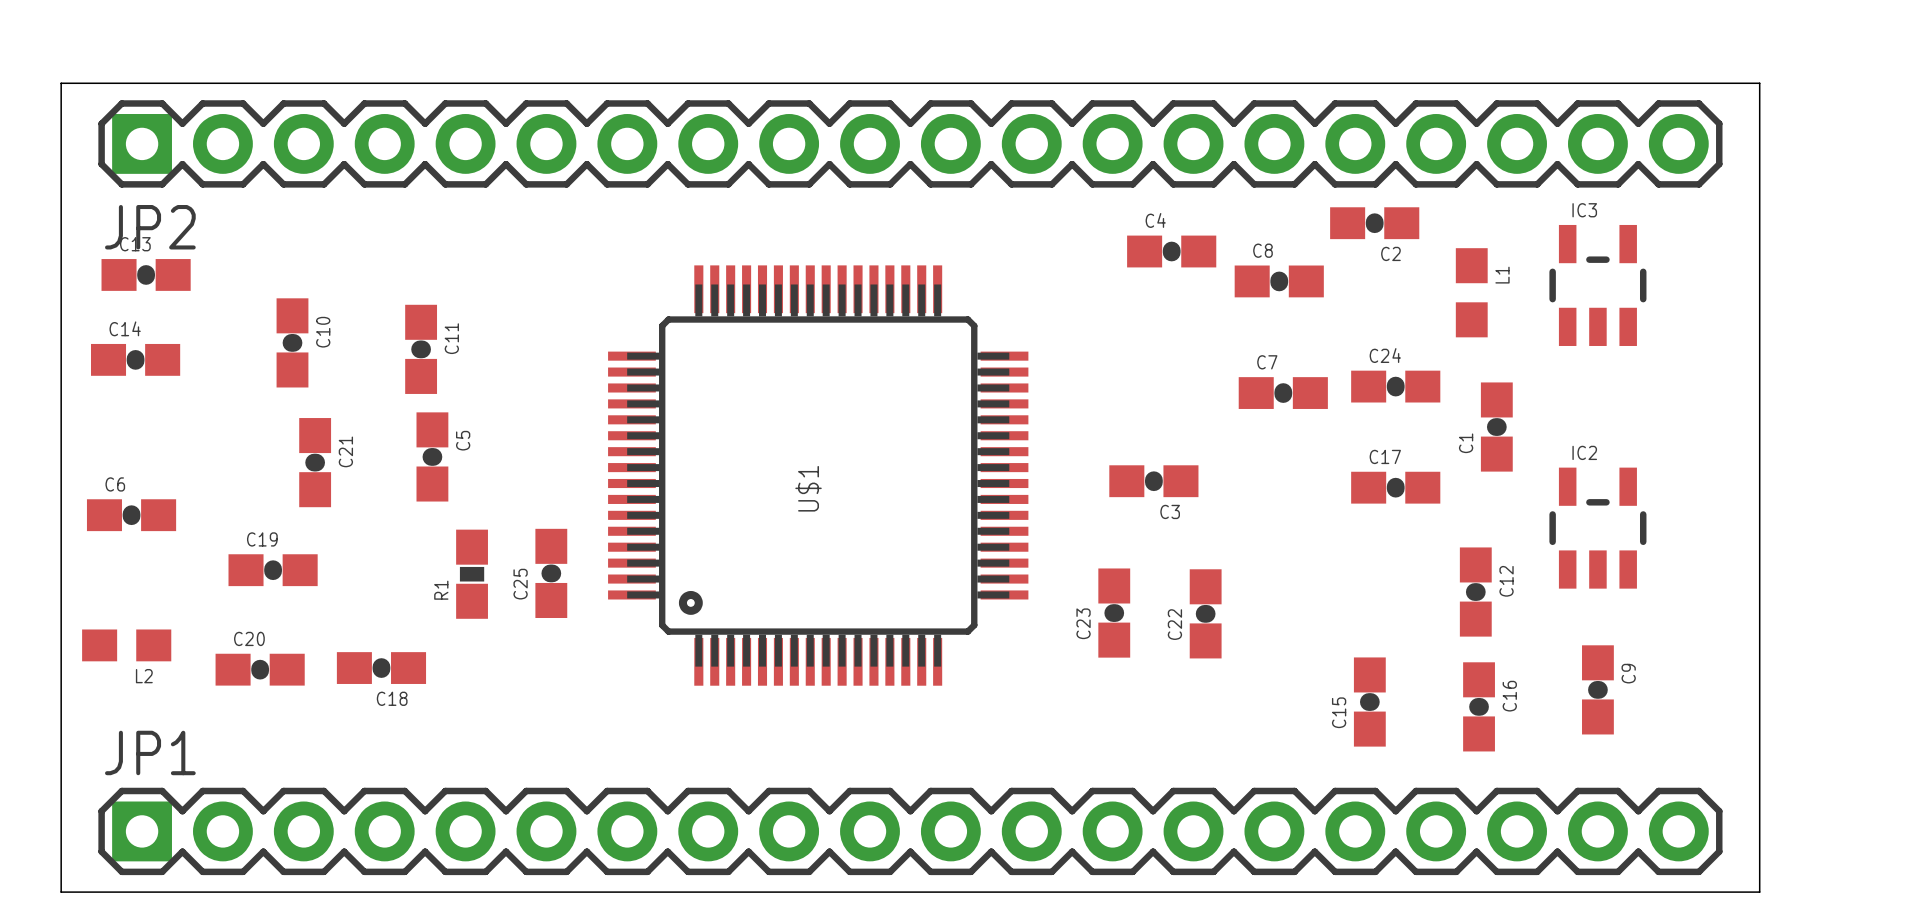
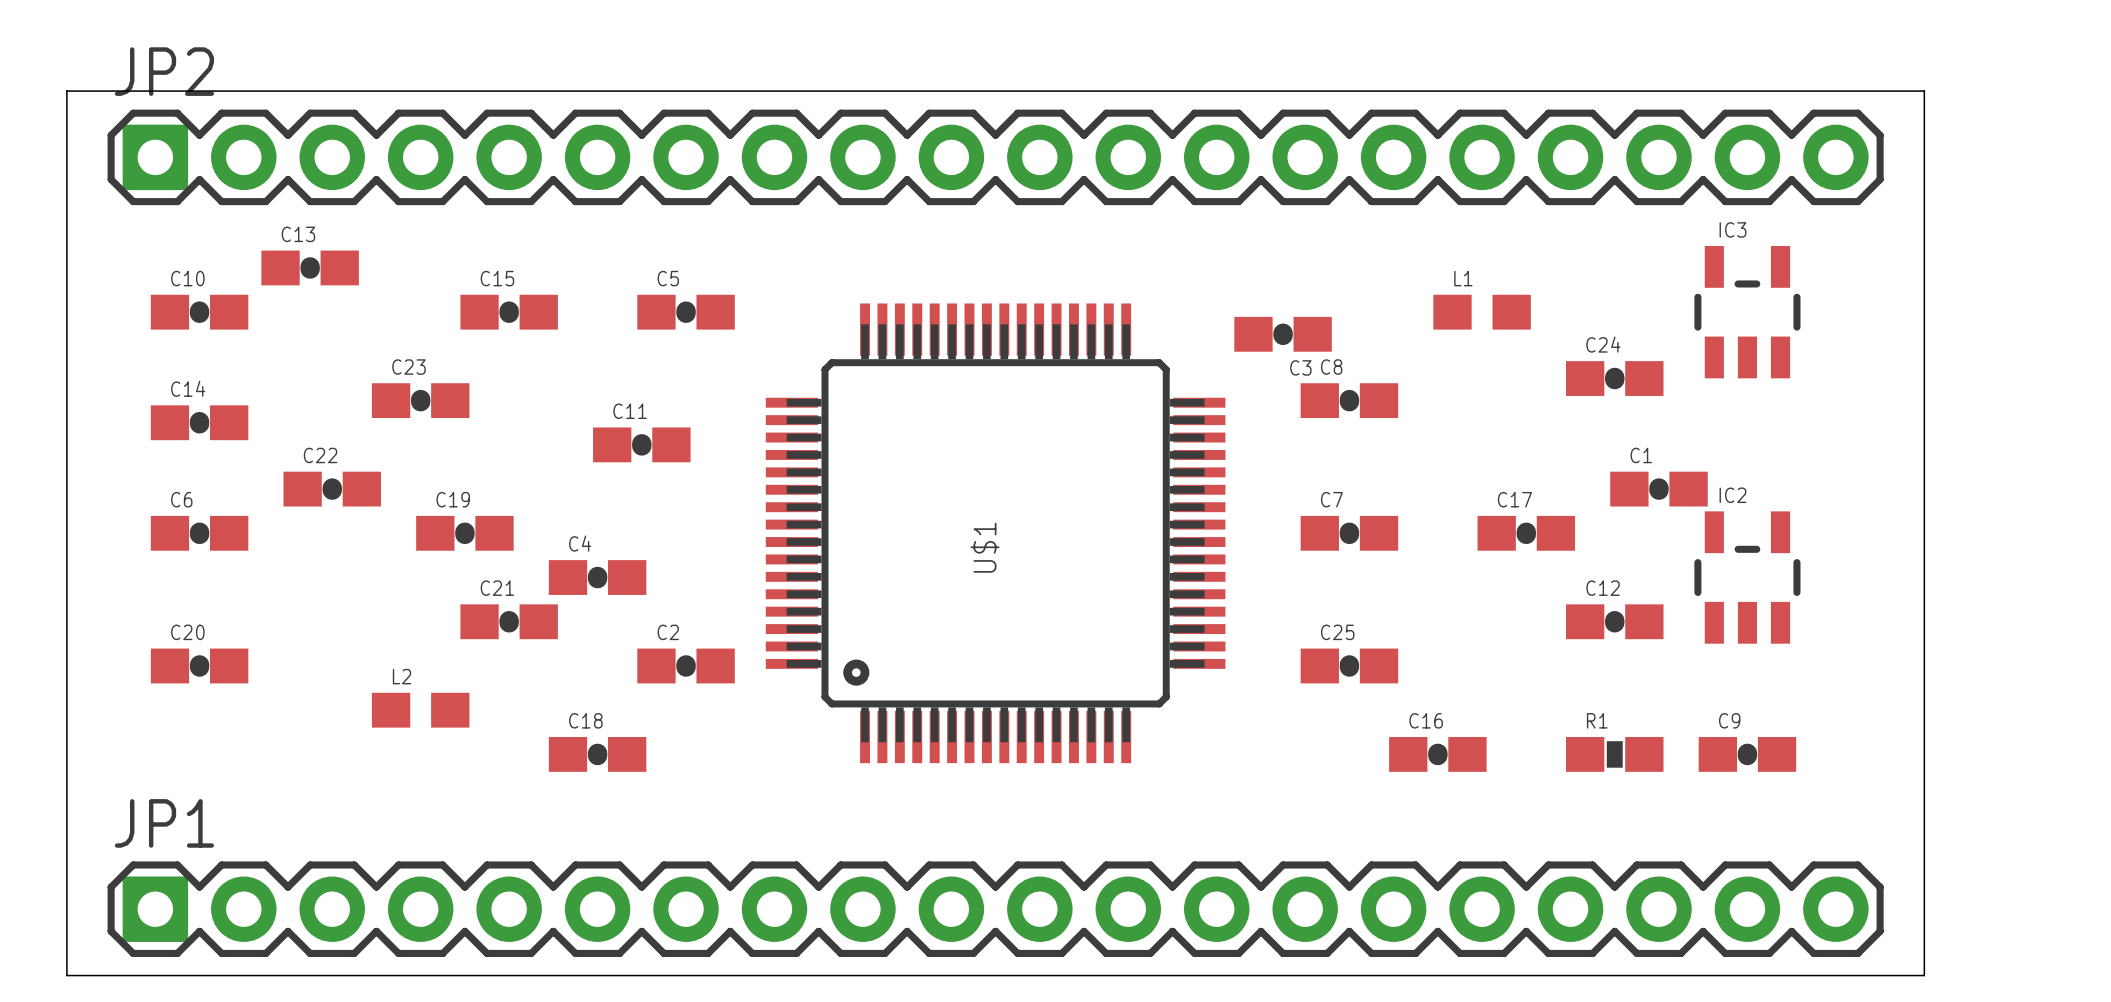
C2 position: (1374, 223) -> (686, 665)
JP2 name position: JP2 (150, 227) -> JP2 (164, 71)
C4 position: (1171, 251) -> (597, 577)
C2 name position: C2 (1390, 253) -> C2 (668, 632)
C13 position: (146, 274) -> (310, 267)
C8 position: (1279, 281) -> (1349, 400)
L1 rotation: 0° (1471, 292) -> 90° clockwise (1482, 312)
L1 position: (1471, 292) -> (1482, 312)
C10 rotation: 0° (292, 342) -> 90° clockwise (199, 312)
C10 position: (292, 342) -> (199, 312)
C11 rotation: 0° (421, 349) -> 90° clockwise (641, 444)
C11 position: (421, 349) -> (641, 444)
C14 position: (135, 359) -> (199, 422)
C24 position: (1395, 386) -> (1614, 378)
C7 position: (1283, 393) -> (1349, 533)
C1 rotation: 0° (1496, 427) -> 90° clockwise (1658, 489)
C5 rotation: 0° (432, 456) -> 90° clockwise (686, 312)
C5 position: (432, 456) -> (686, 312)
C21 rotation: 0° (315, 462) -> 90° clockwise (509, 621)
C21 position: (315, 462) -> (509, 621)
U$1 position: (818, 475) -> (995, 533)
C3 position: (1153, 481) -> (1283, 334)
C6 position: (131, 515) -> (199, 533)
C19 position: (273, 570) -> (464, 533)
C25 rotation: 0° (551, 573) -> 90° clockwise (1349, 665)
C25 position: (551, 573) -> (1349, 665)
R1 rotation: 0° (472, 574) -> 90° clockwise (1614, 754)
R1 position: (472, 574) -> (1614, 754)
C12 rotation: 0° (1475, 592) -> 90° clockwise (1614, 621)
C23 rotation: 0° (1114, 613) -> 90° clockwise (420, 400)
C23 position: (1114, 613) -> (420, 400)
C22 rotation: 0° (1205, 613) -> 90° clockwise (332, 489)
C22 position: (1205, 613) -> (332, 489)
L2 position: (126, 645) -> (420, 710)
C18 position: (381, 668) -> (597, 754)
C20 position: (260, 669) -> (199, 665)
L2 name position: L2 (144, 676) -> L2 (402, 676)
C9 rotation: 0° (1597, 689) -> 90° clockwise (1747, 754)
C18 name position: C18 (392, 698) -> C18 (585, 720)
C15 rotation: 0° (1369, 702) -> 90° clockwise (509, 312)
C15 position: (1369, 702) -> (509, 312)
C16 rotation: 0° (1479, 706) -> 90° clockwise (1437, 754)
C16 position: (1479, 706) -> (1437, 754)

